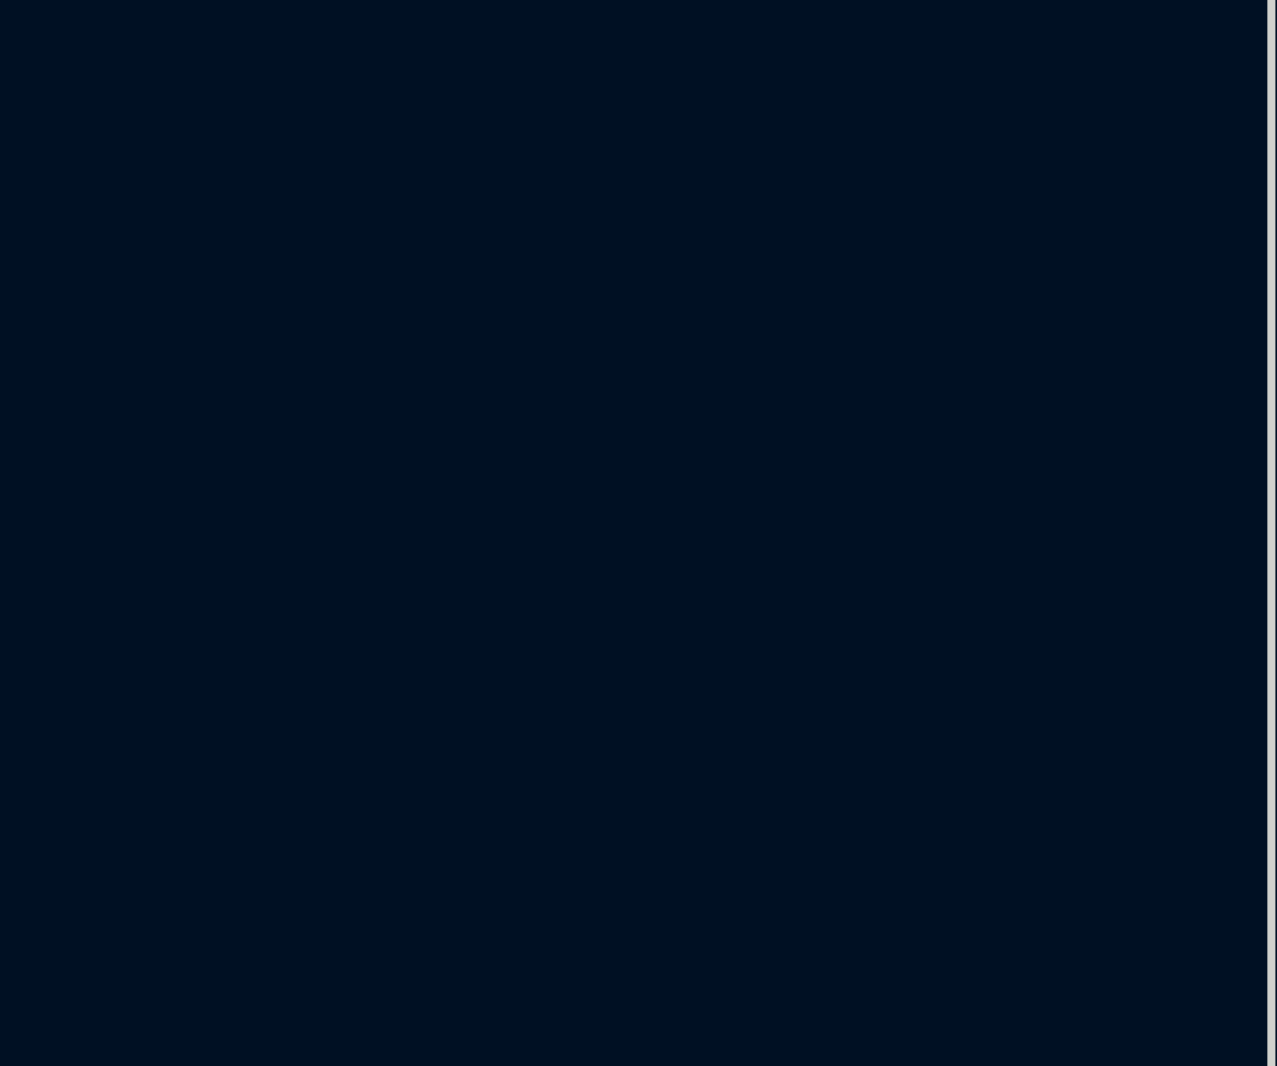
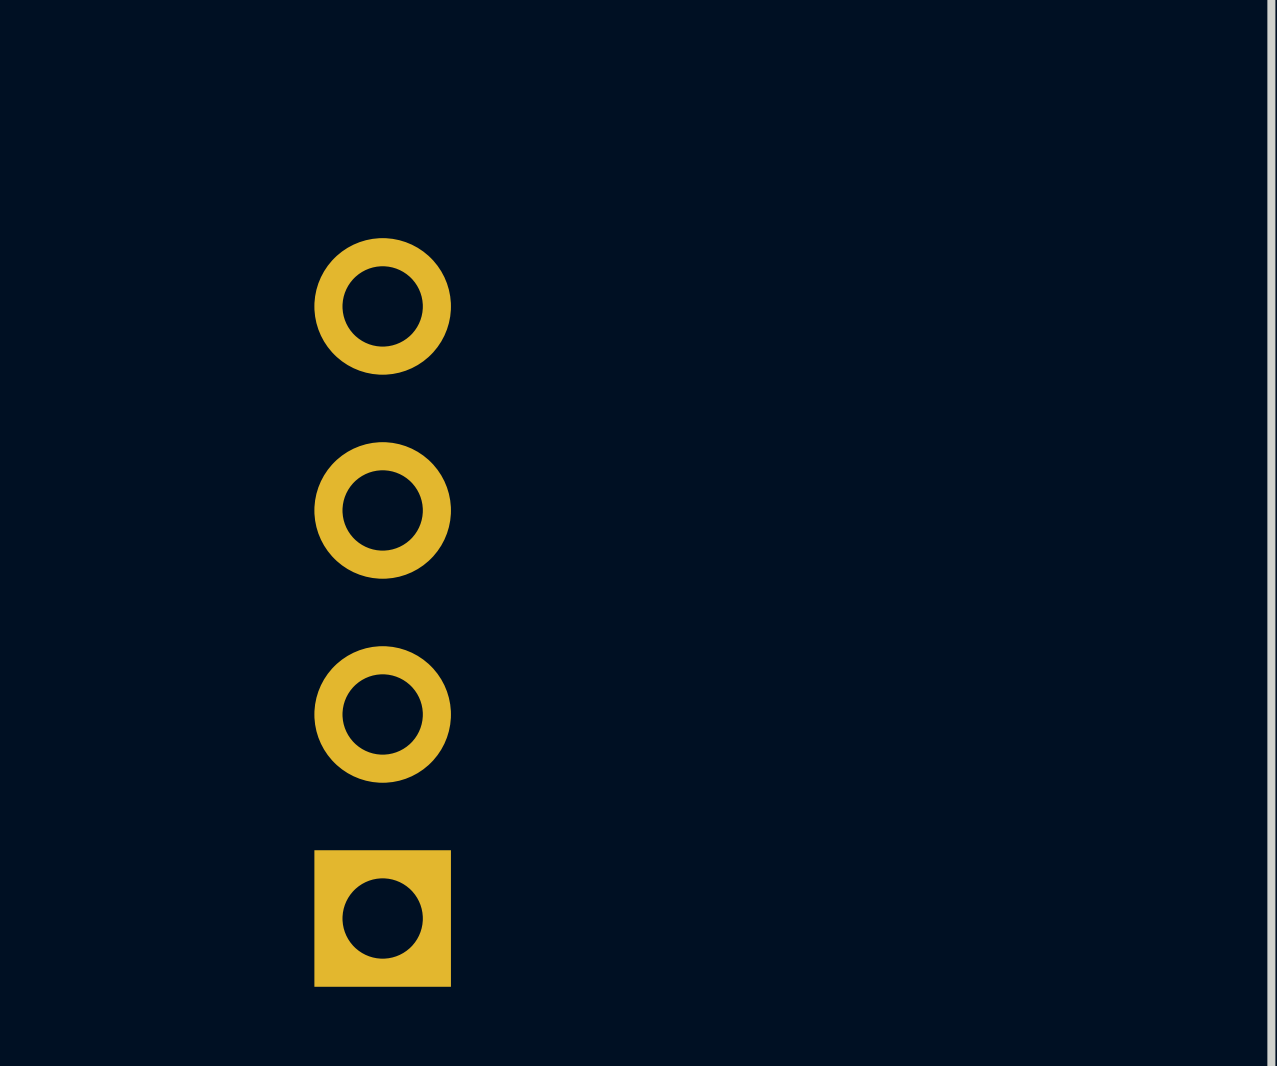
part: none -> (382, 612)

